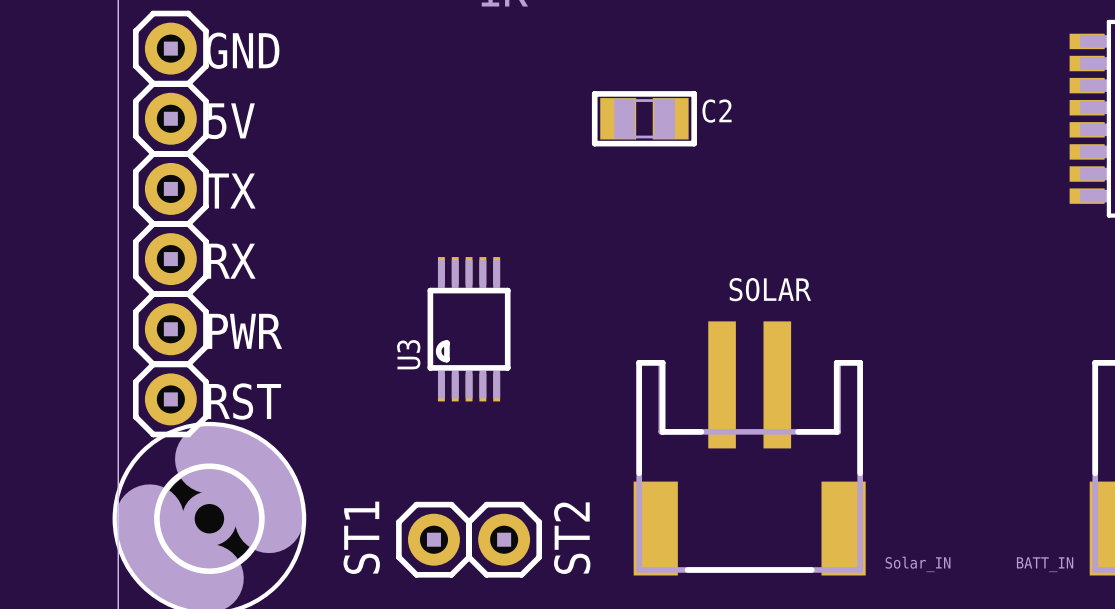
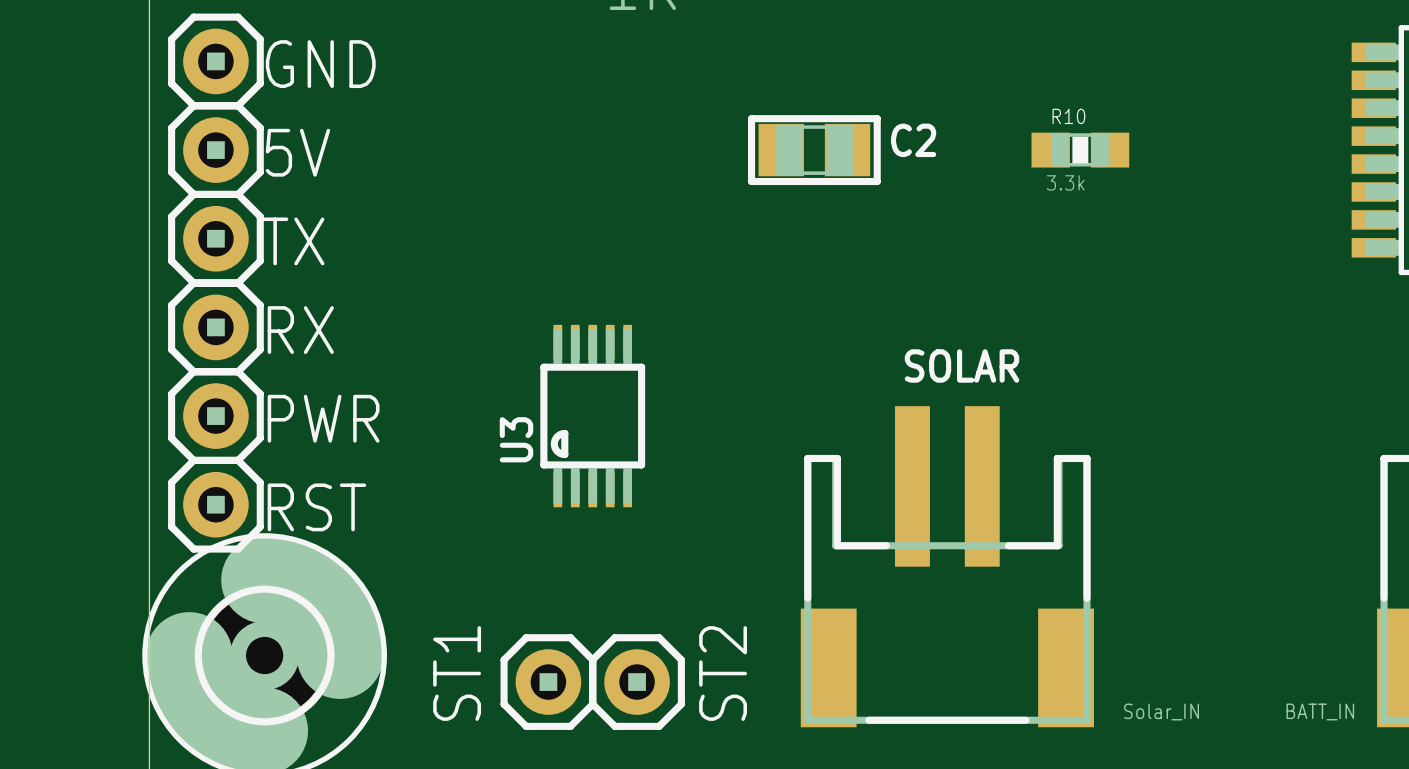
R10: none -> 3.3k (1080, 150)

